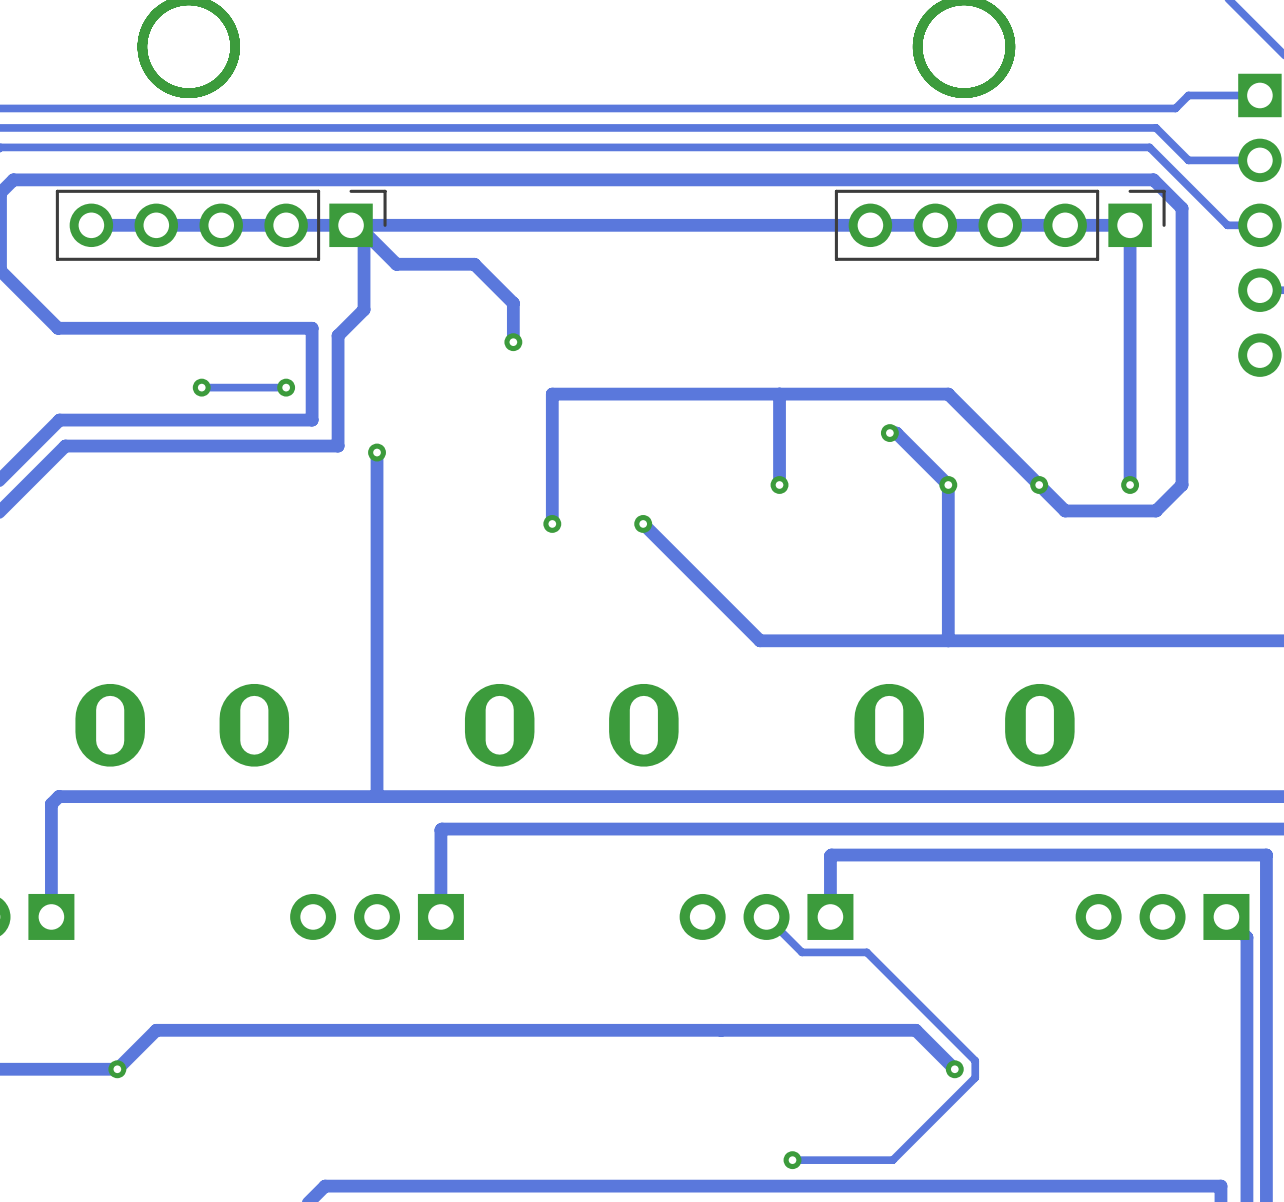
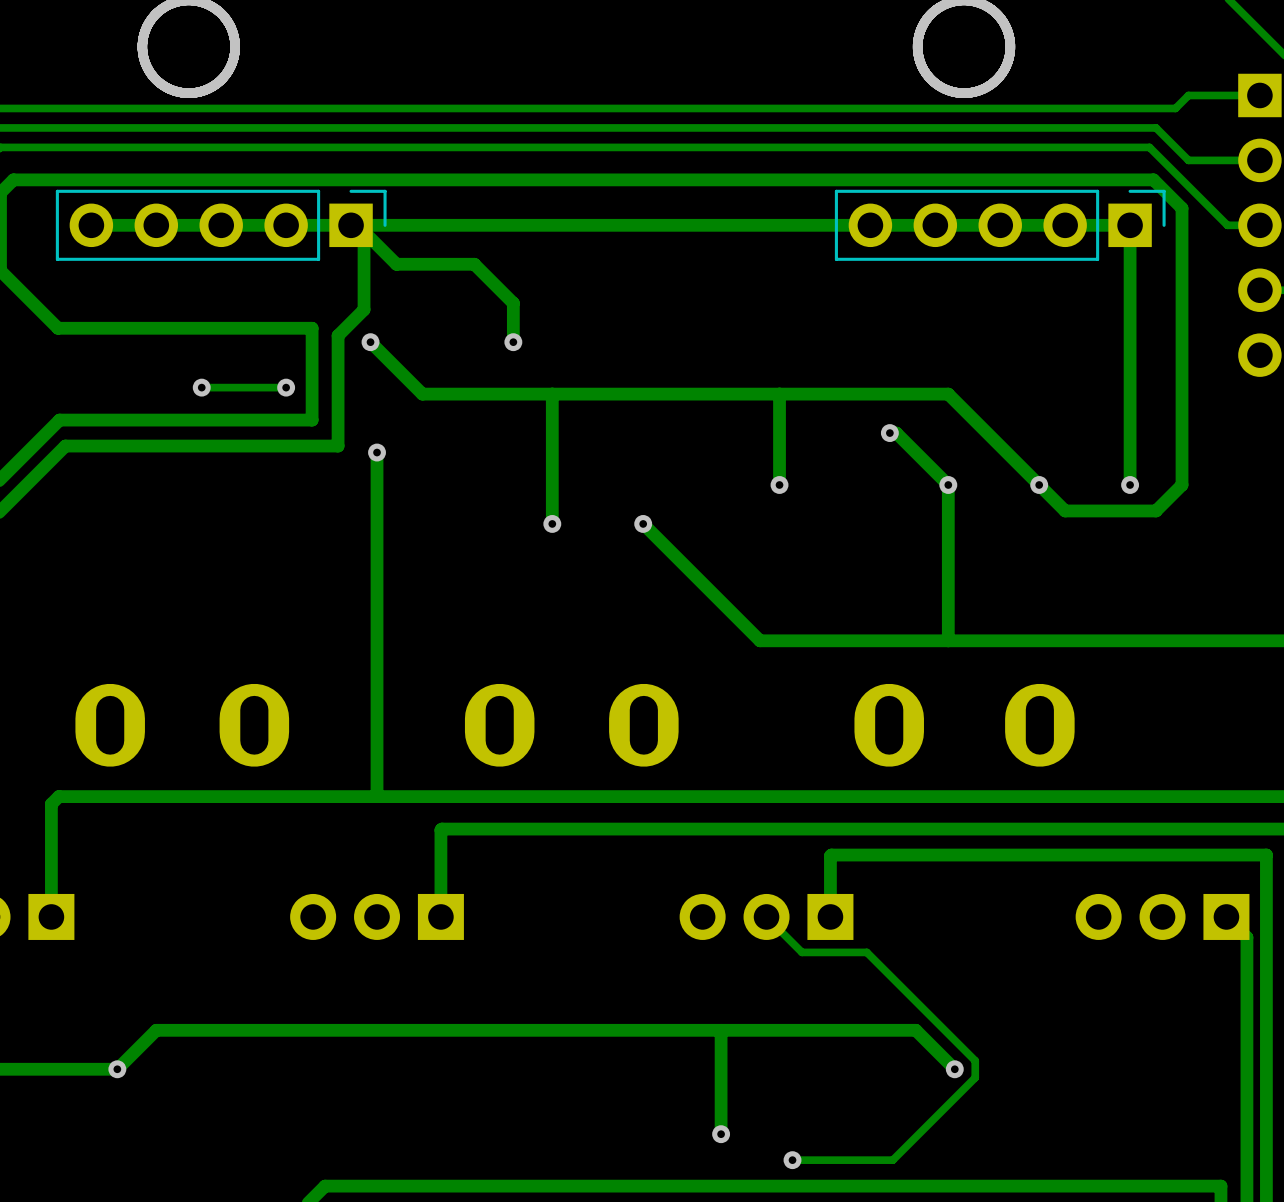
track: none -> (370, 342) (422, 394) (552, 394)
via: none -> (370, 342)
track: none -> (721, 1030) (721, 1134)
via: none -> (721, 1134)

